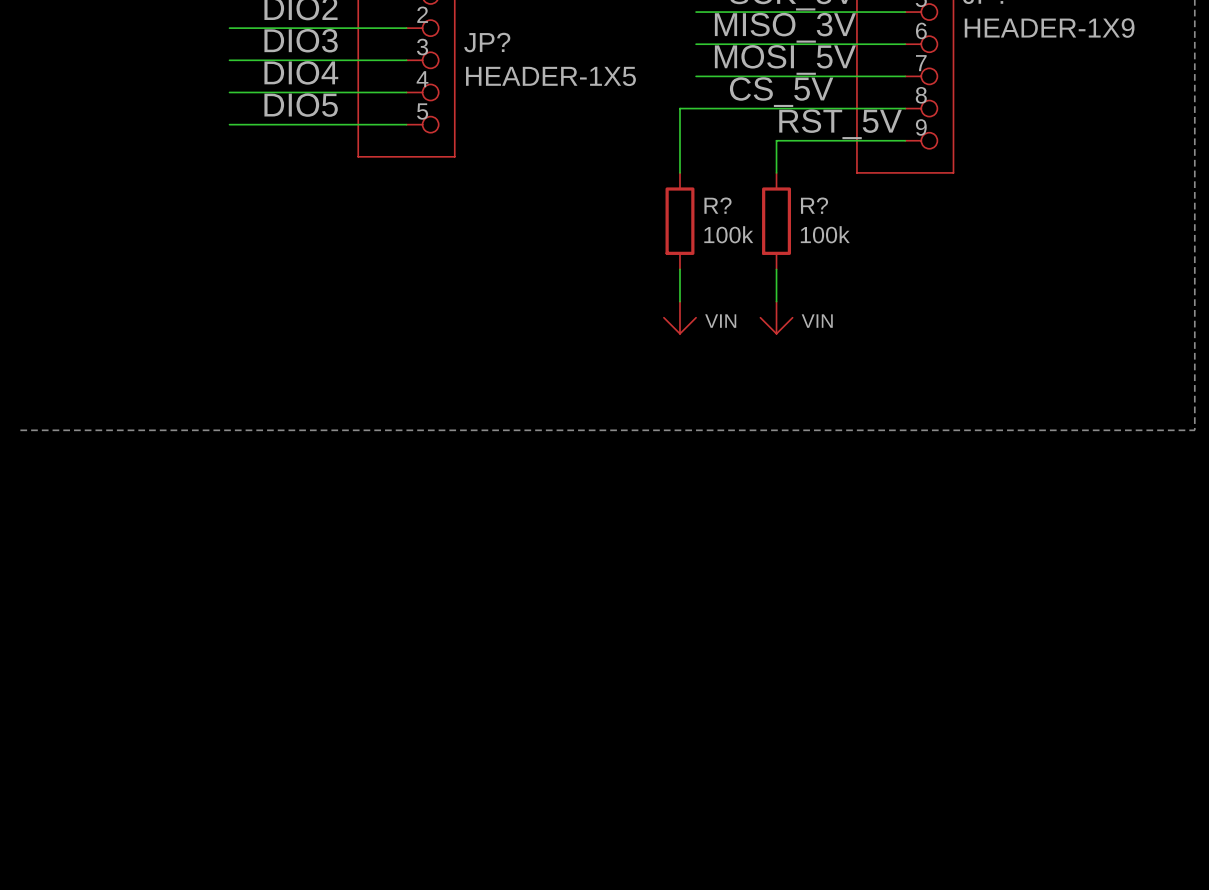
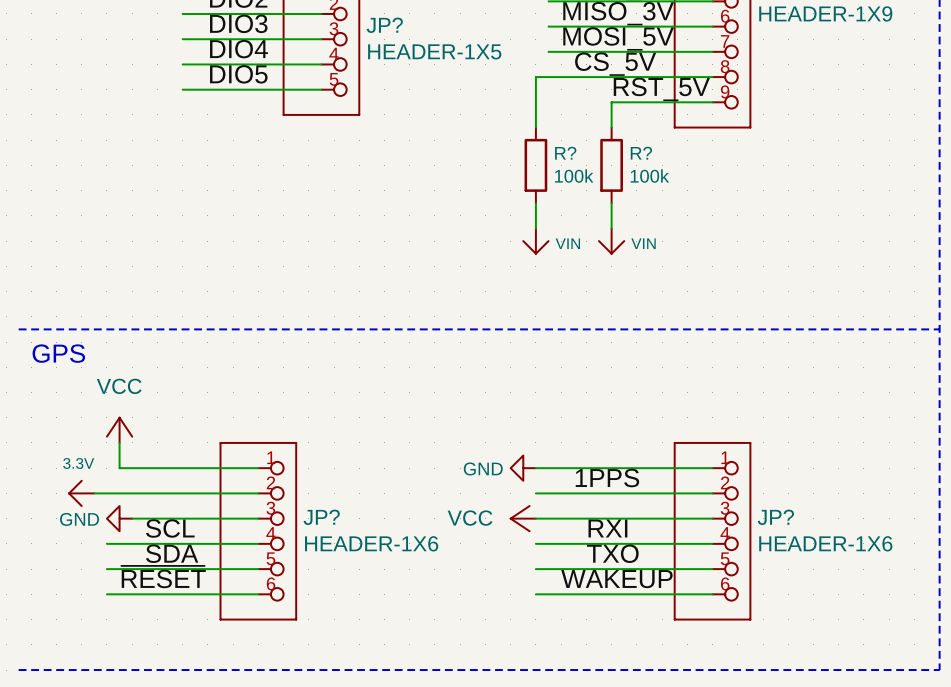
line: none -> (939, 329) (939, 670) (18, 670)
text: none -> GPS (58, 353)
power symbol: none -> VCC (119, 430)
wire: none -> (119, 442) (119, 468) (258, 468)
power symbol: none -> GND (523, 468)
wire: none -> (535, 468) (712, 468)
label: none -> 1PPS (607, 478)
power symbol: none -> 3.3V (81, 493)
wire: none -> (94, 493) (258, 493)
wire: none -> (535, 493) (712, 493)
power symbol: none -> GND (119, 518)
wire: none -> (132, 518) (258, 518)
power symbol: none -> VCC (523, 518)
wire: none -> (535, 518) (712, 518)
label: none -> SCL (170, 528)
label: none -> RXI (607, 528)
JP?: none -> HEADER-1X6 (258, 531)
JP?: none -> HEADER-1X6 (712, 531)
wire: none -> (106, 543) (258, 543)
wire: none -> (535, 543) (712, 543)
label: none -> SDA (172, 553)
label: none -> TXO (612, 553)
wire: none -> (106, 569) (258, 569)
wire: none -> (535, 569) (712, 569)
label: none -> ~{RESET} (163, 577)
label: none -> WAKEUP (616, 579)
wire: none -> (106, 594) (258, 594)
wire: none -> (535, 594) (712, 594)

